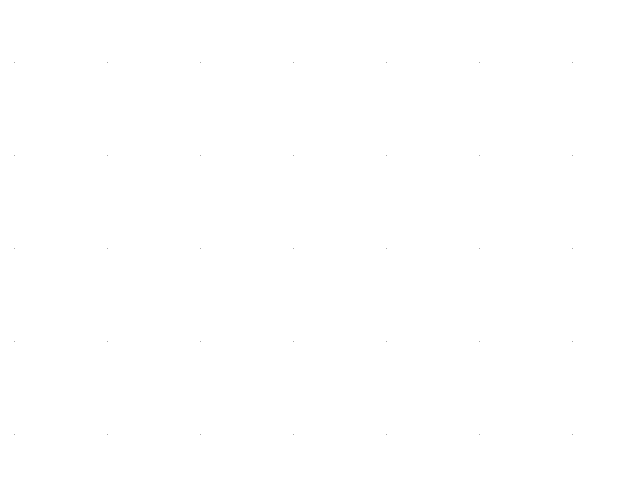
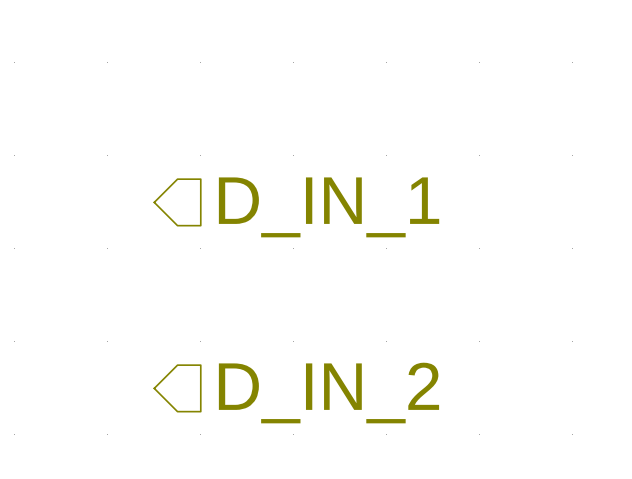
hierarchical label: none -> D_IN_1 (329, 207)
hierarchical label: none -> D_IN_2 (328, 393)

